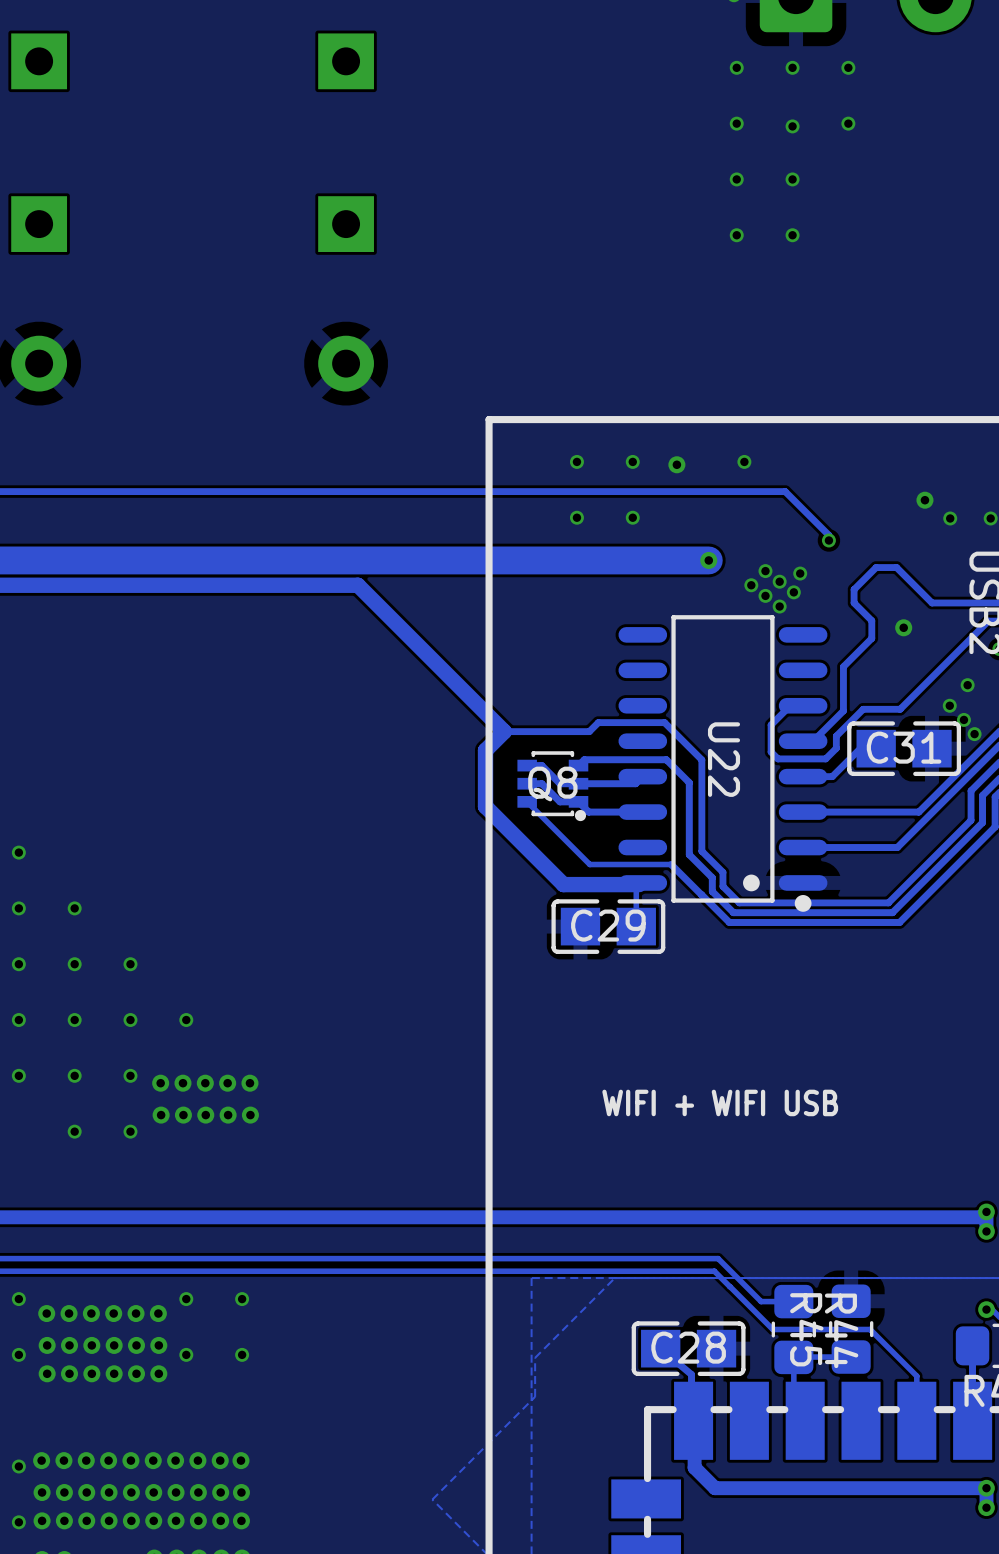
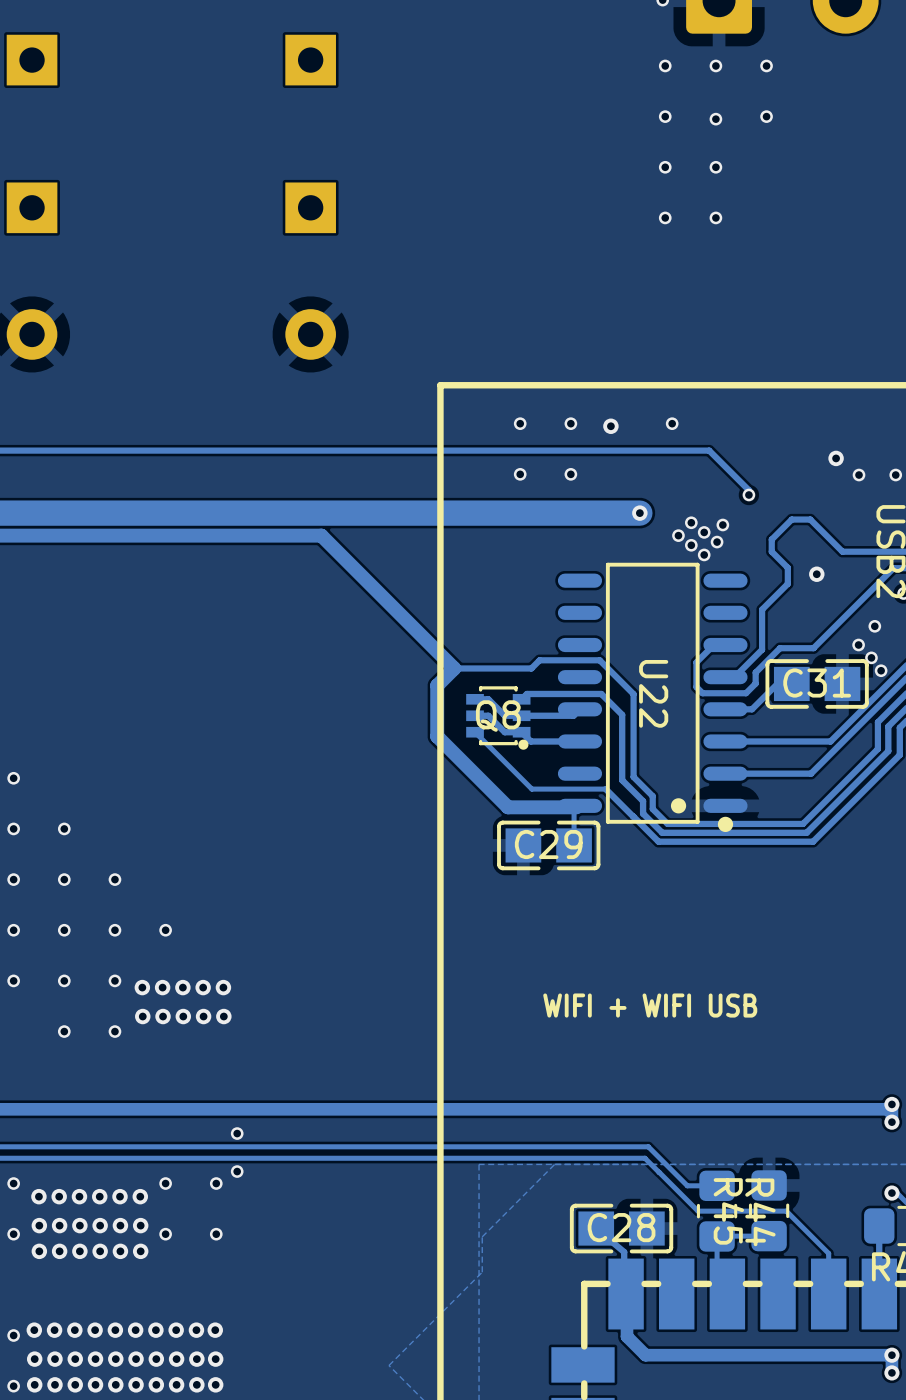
via: none -> (237, 1133)
via: none -> (237, 1171)

